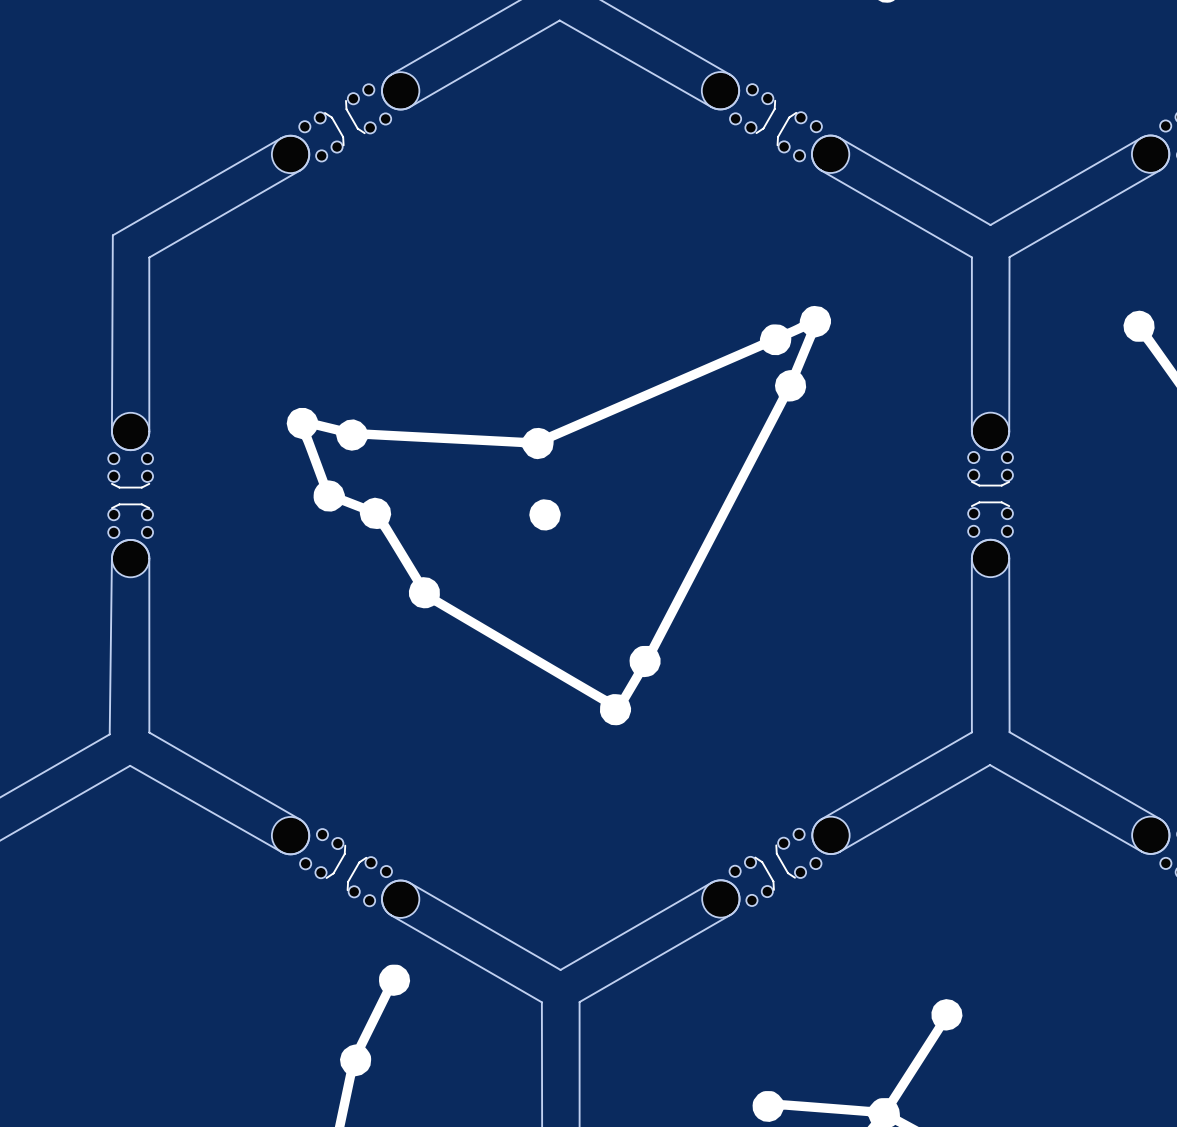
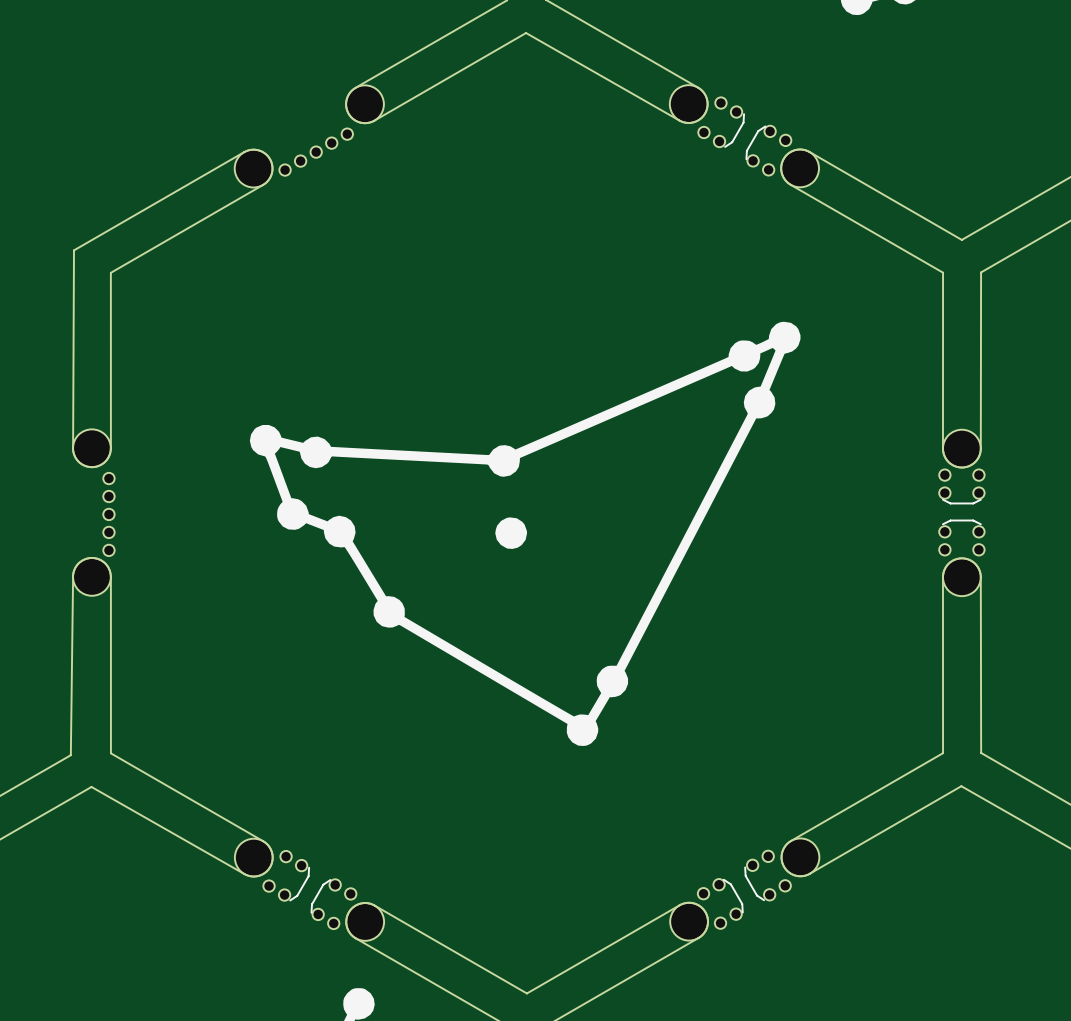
part footprint: [271, 72, 420, 174] -> [234, 85, 384, 188]
part footprint: [108, 412, 154, 578] -> [72, 429, 115, 596]

